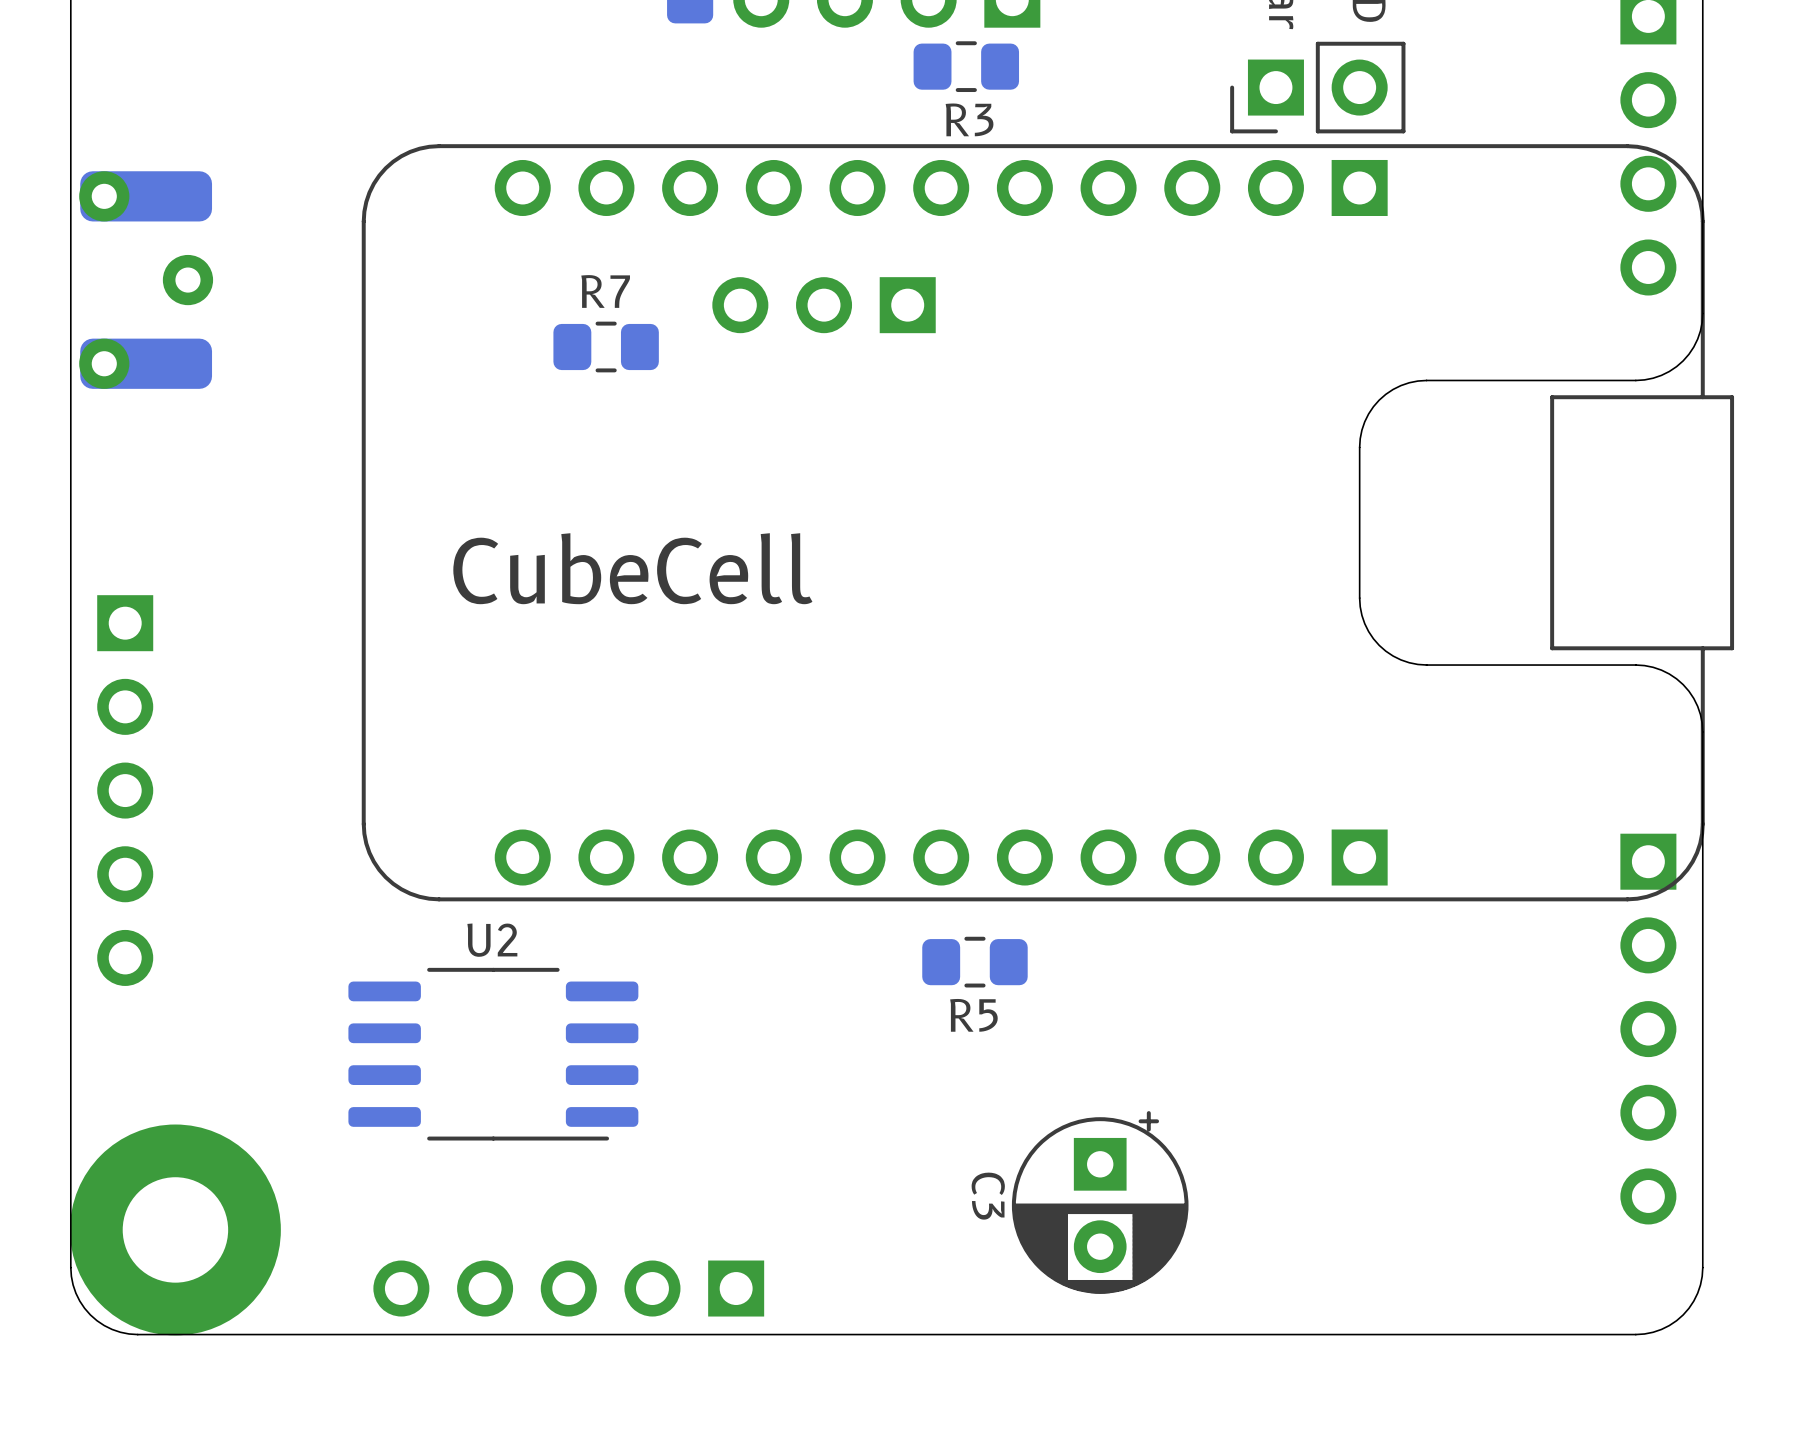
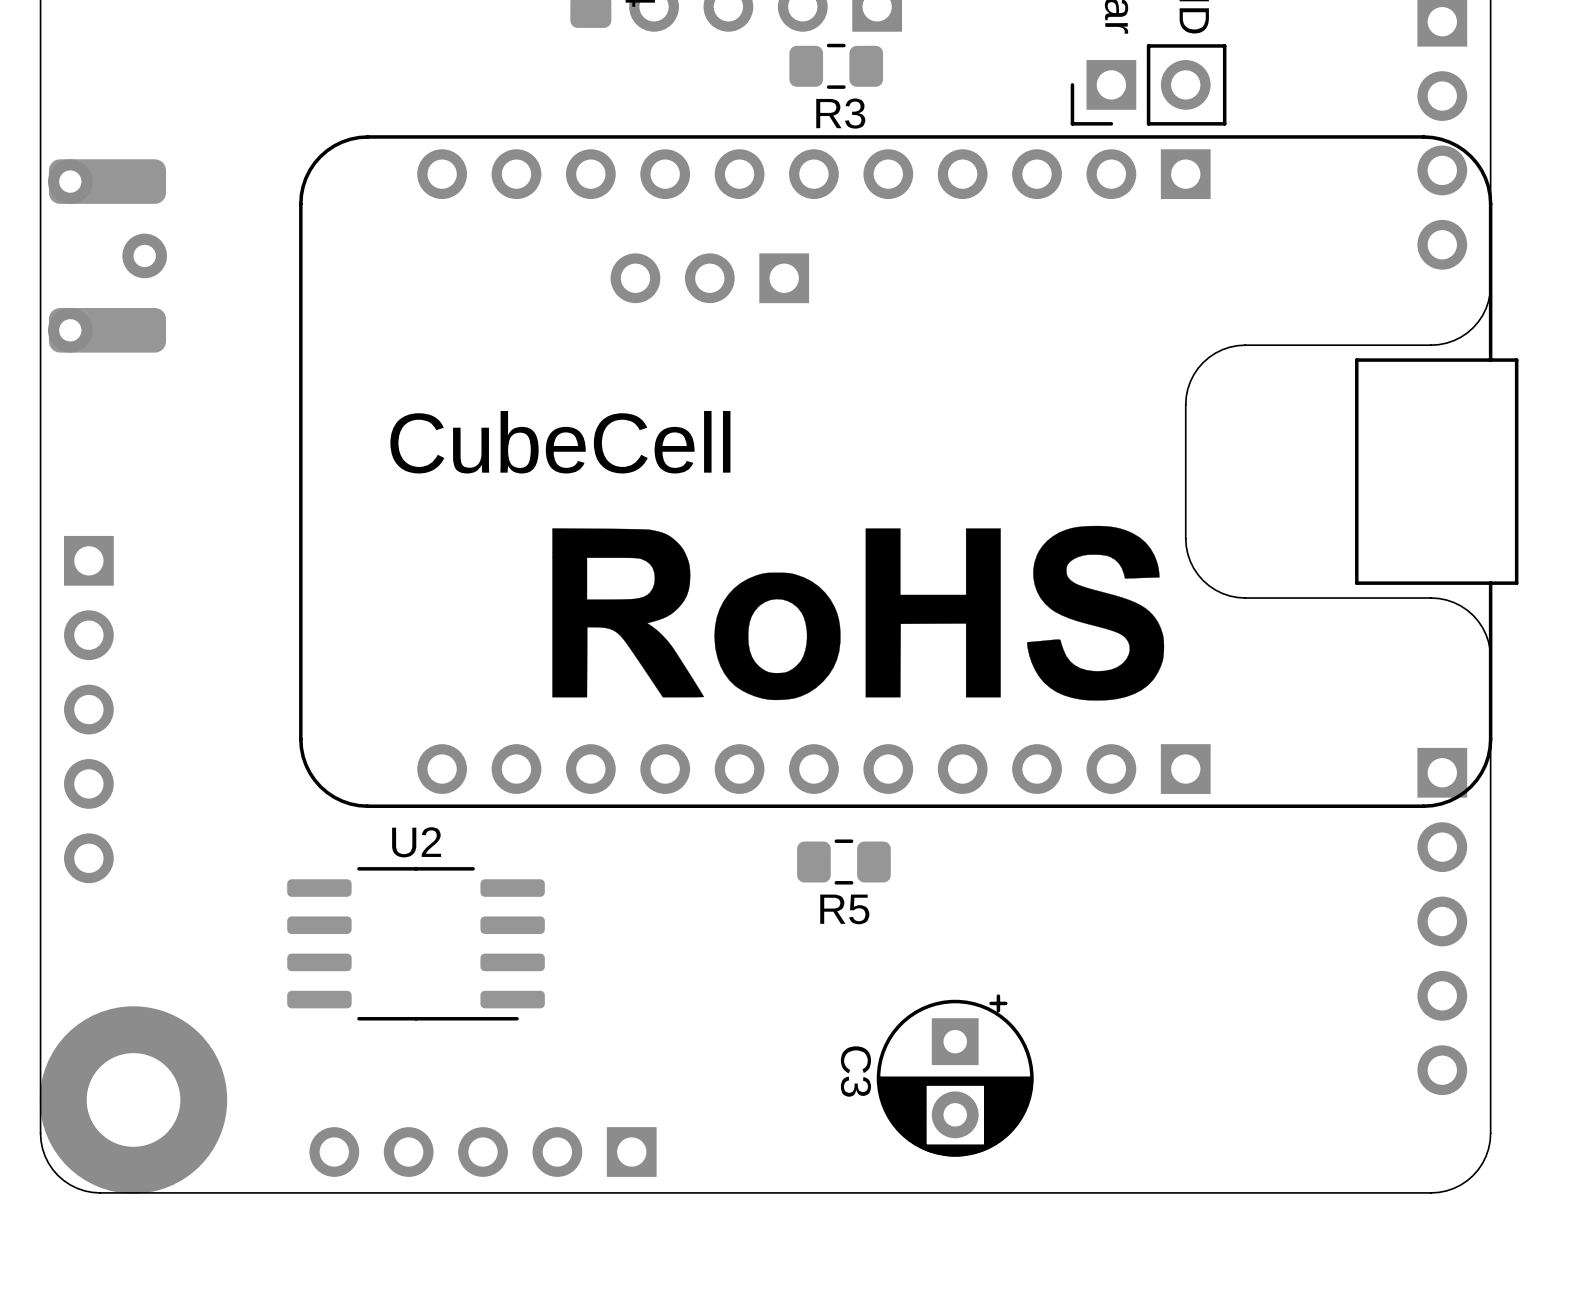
R7: (606, 347) -> none
text position: CubeCell (632, 568) -> CubeCell (560, 442)
drawing: none -> [552, 525, 1165, 701]

